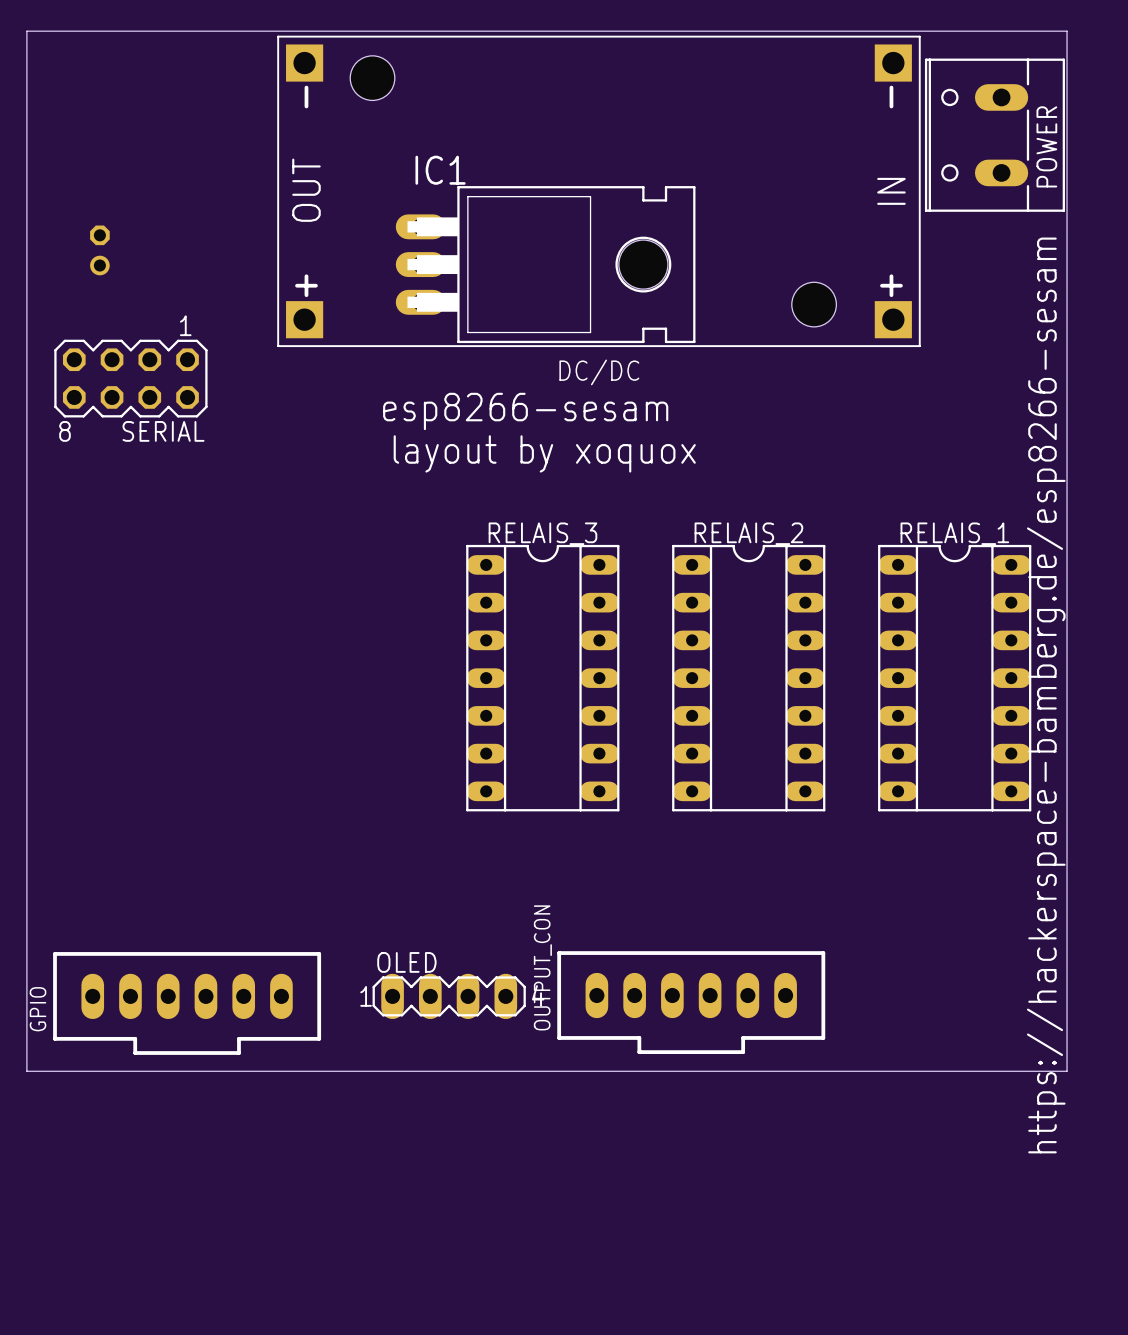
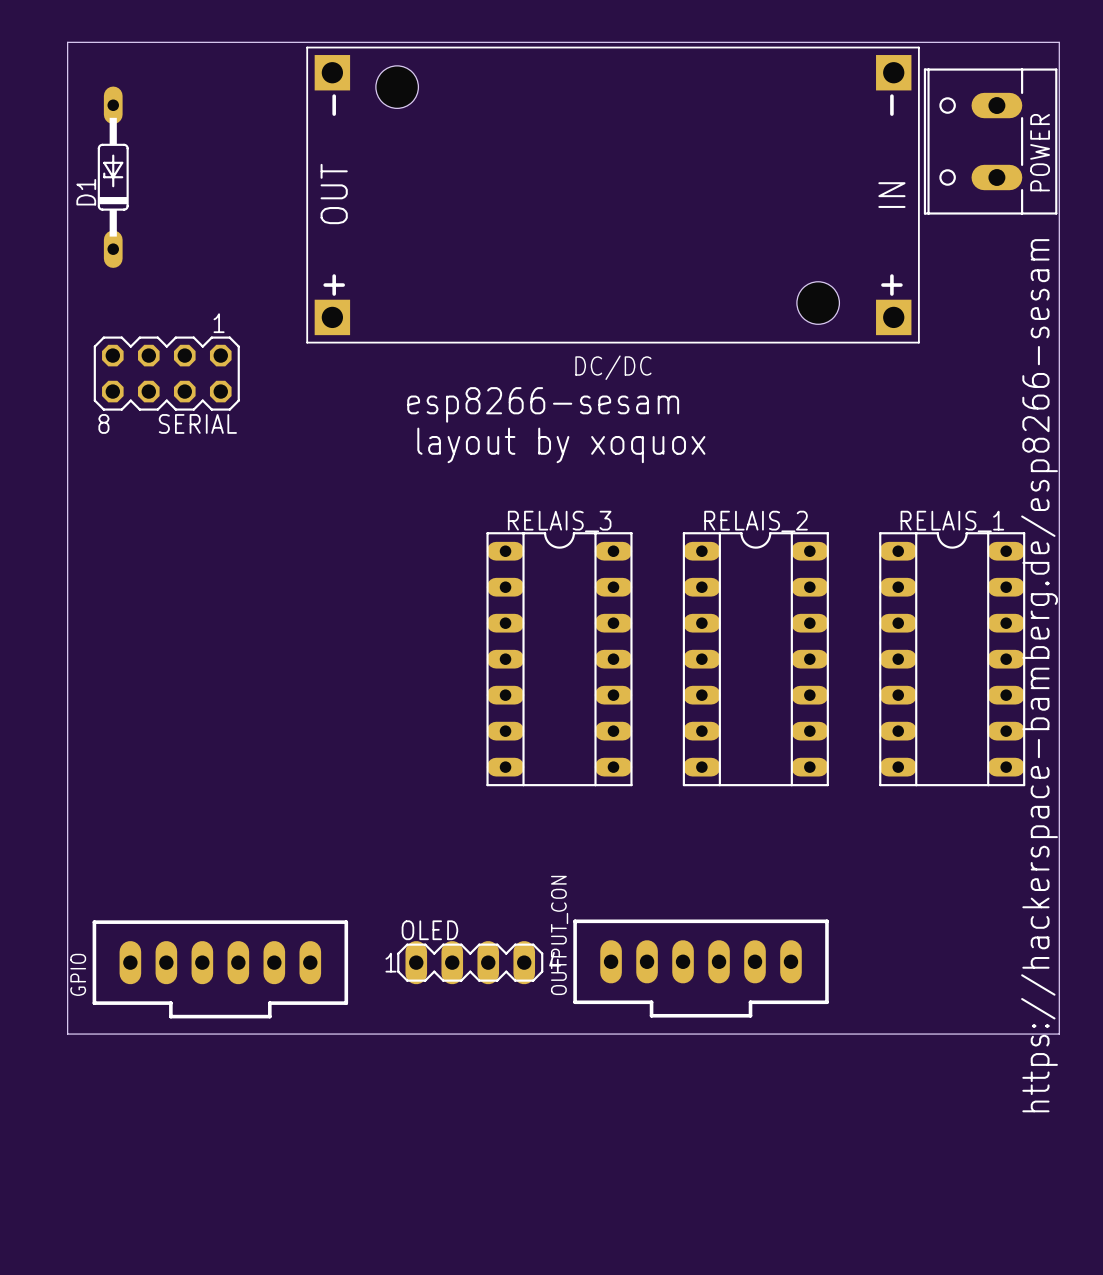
D1: none -> (113, 177)
part: (99, 250) -> none
IC1: (545, 264) -> none

